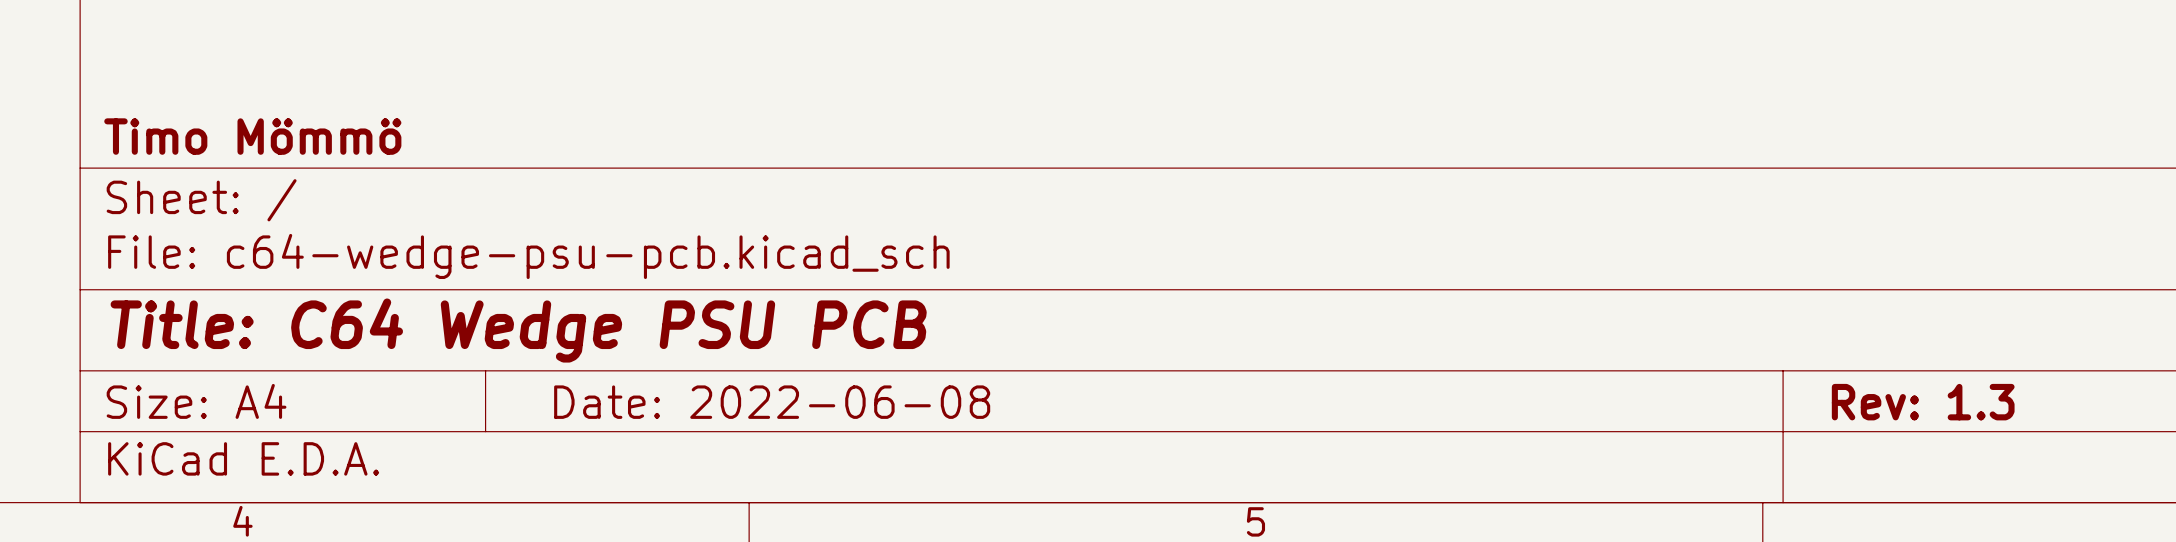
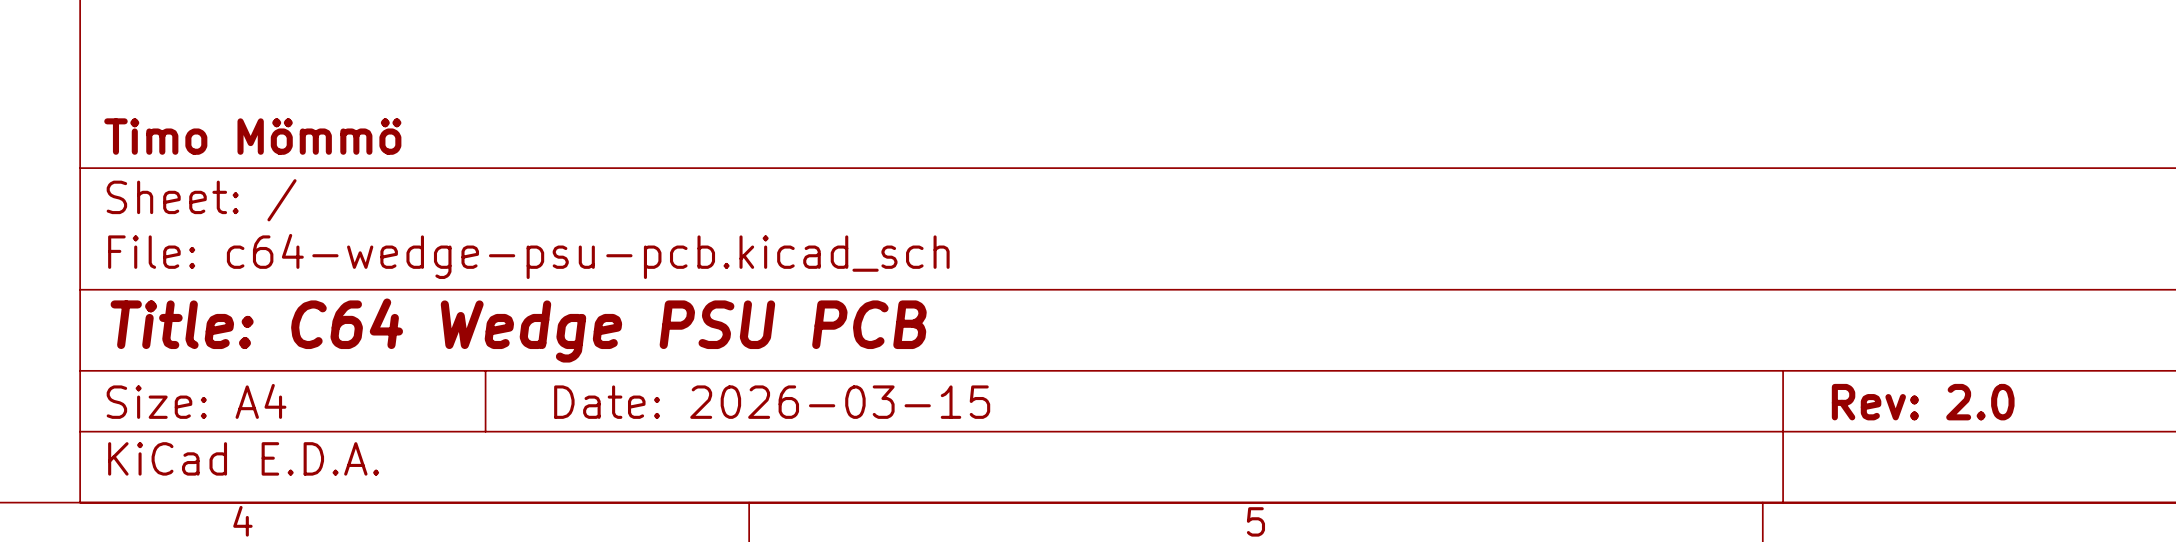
title block: Date: 2022-06-08 (772, 402) -> Date: 2026-03-15 (772, 402)
title block: Rev: 1.3 (1923, 402) -> Rev: 2.0 (1923, 402)

